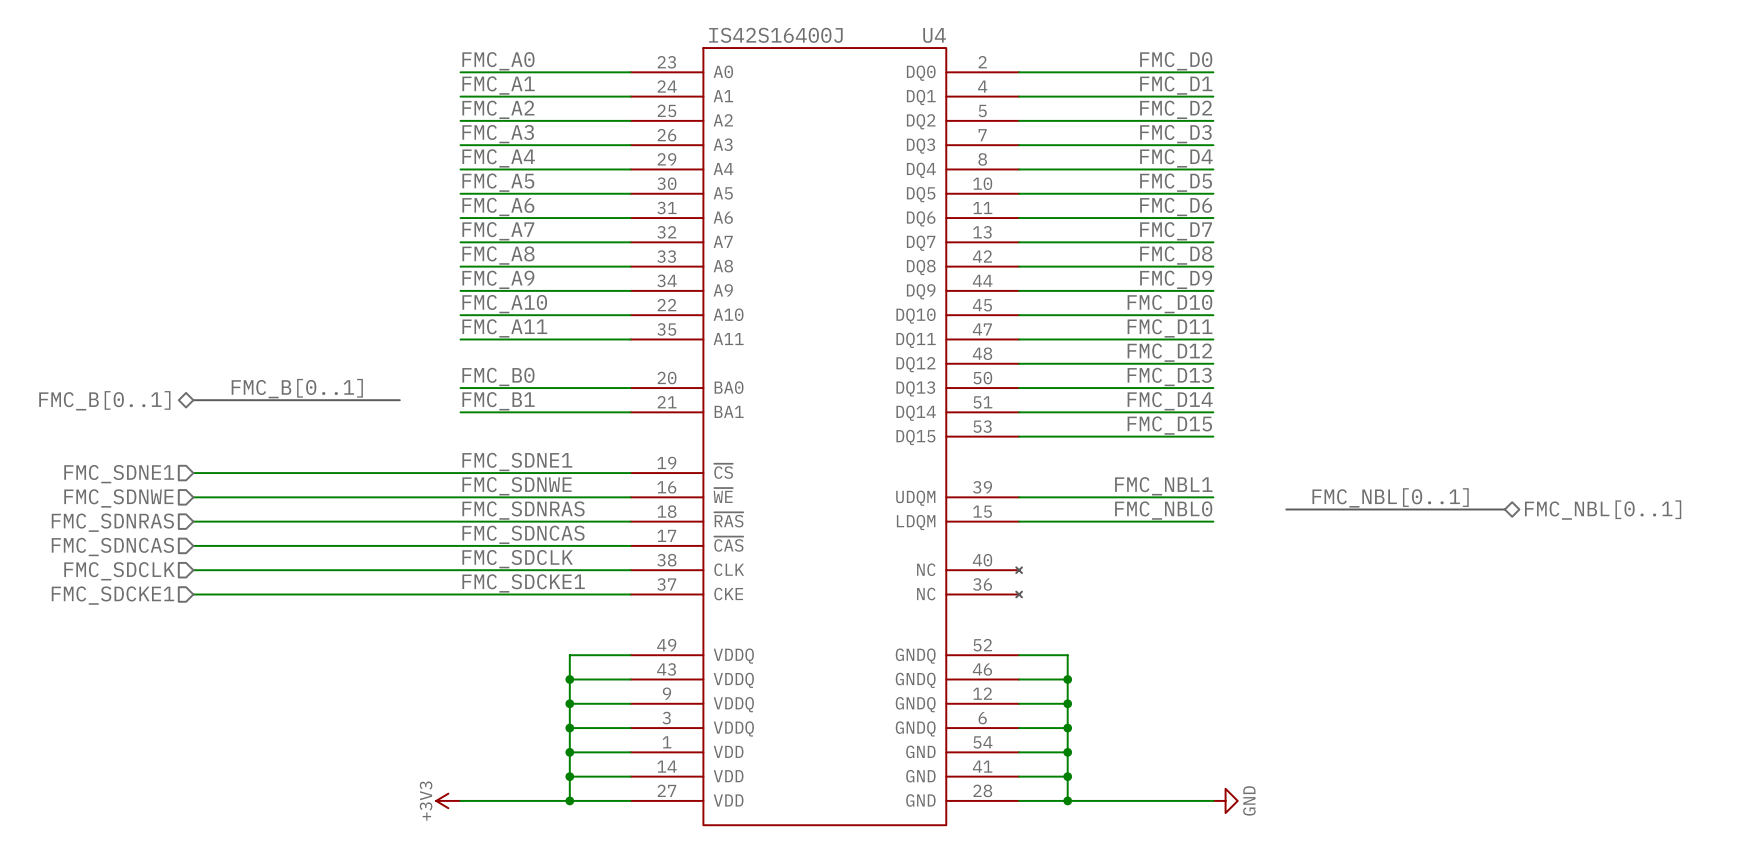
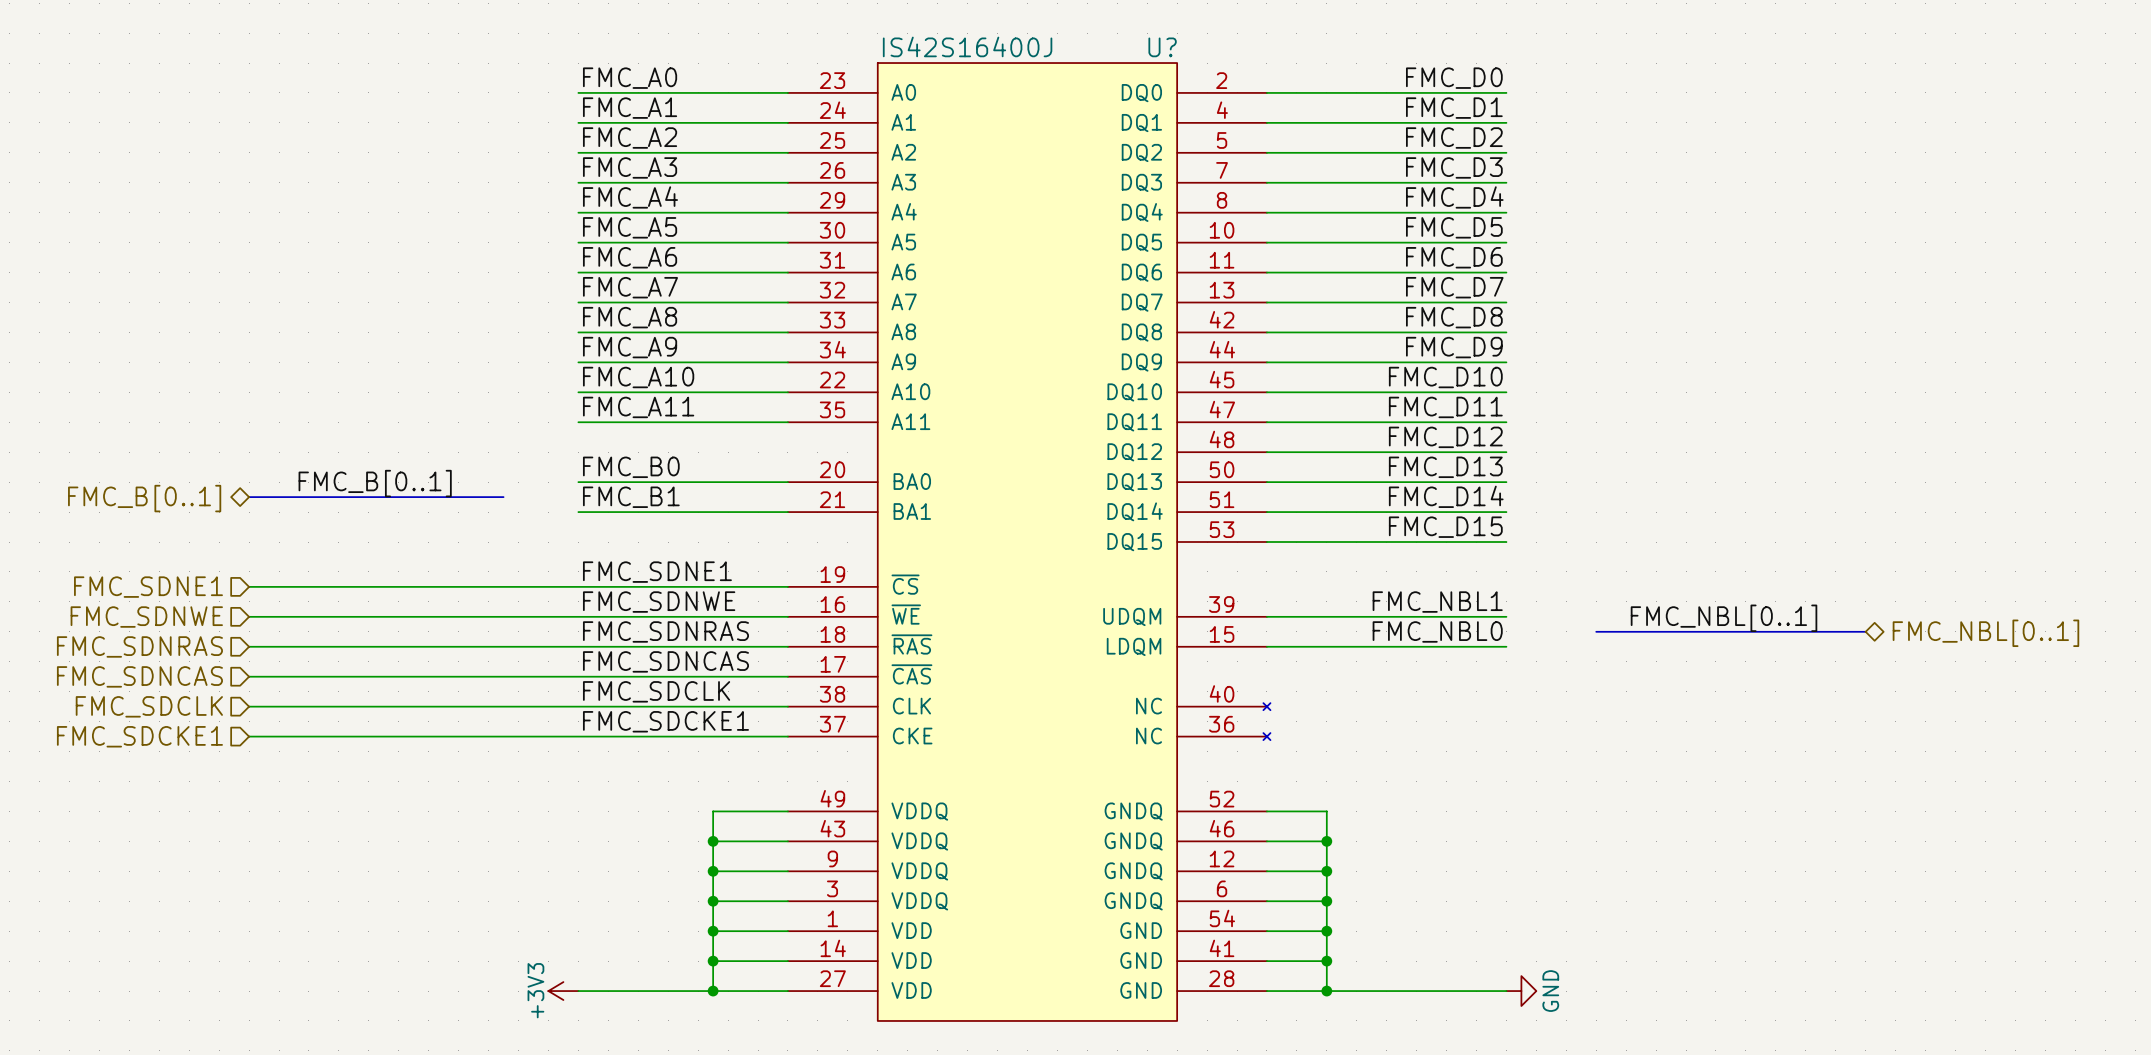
U4 name: U4 (934, 35) -> U? (1162, 47)

